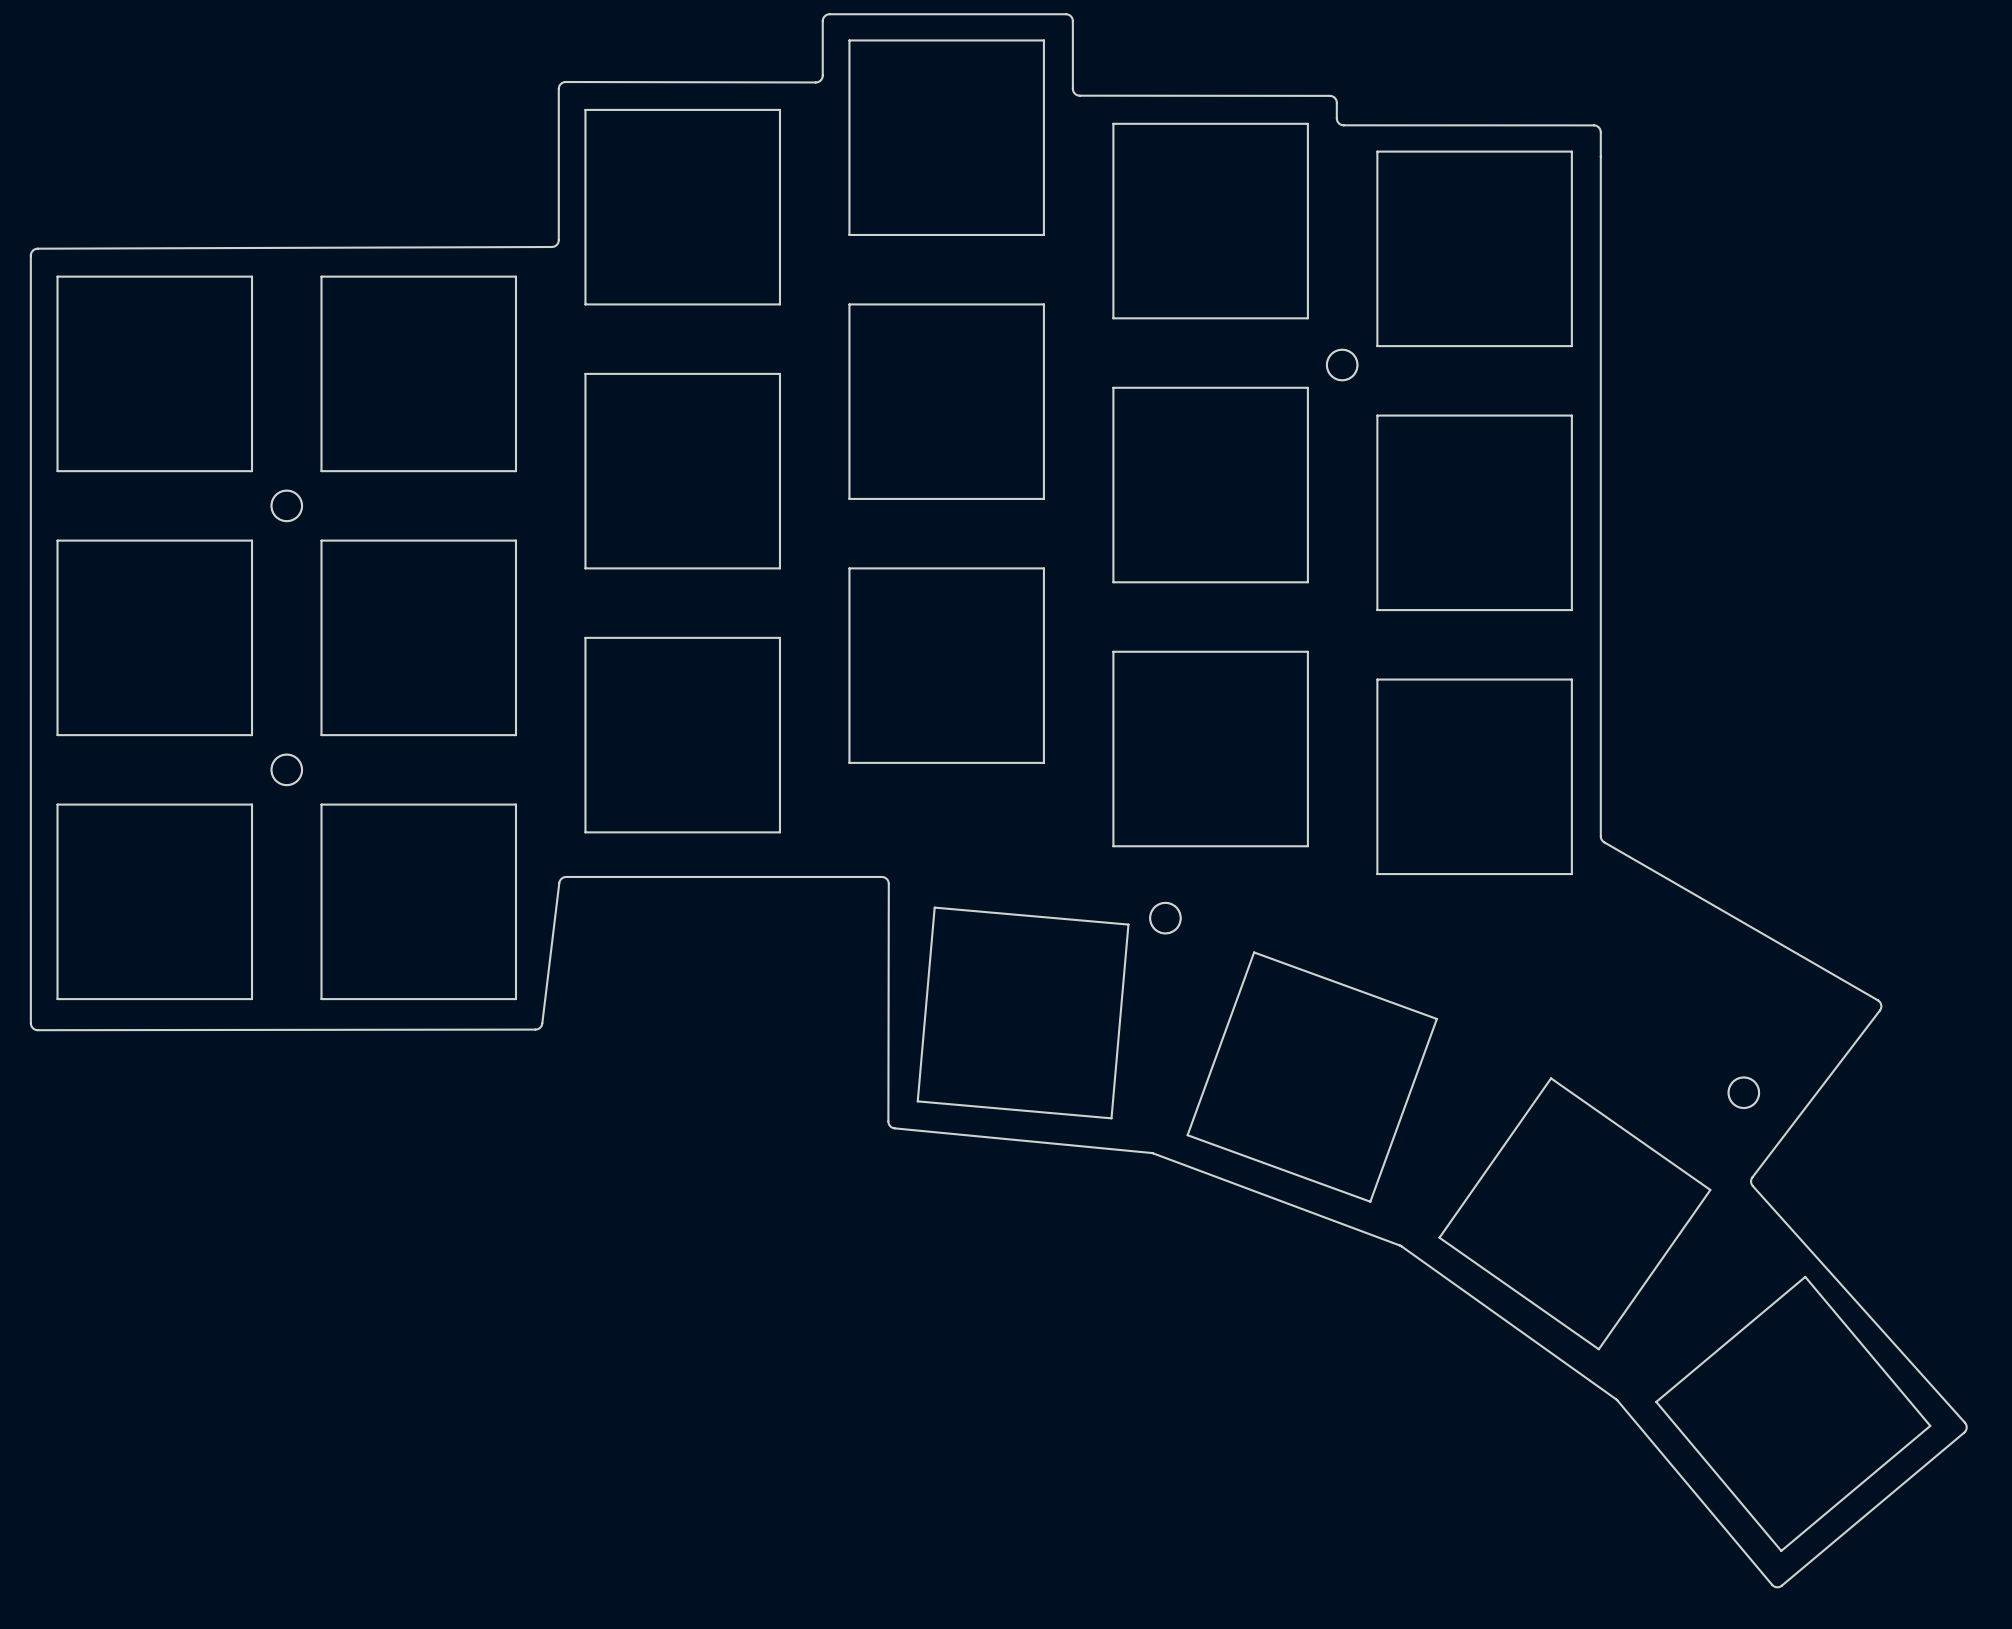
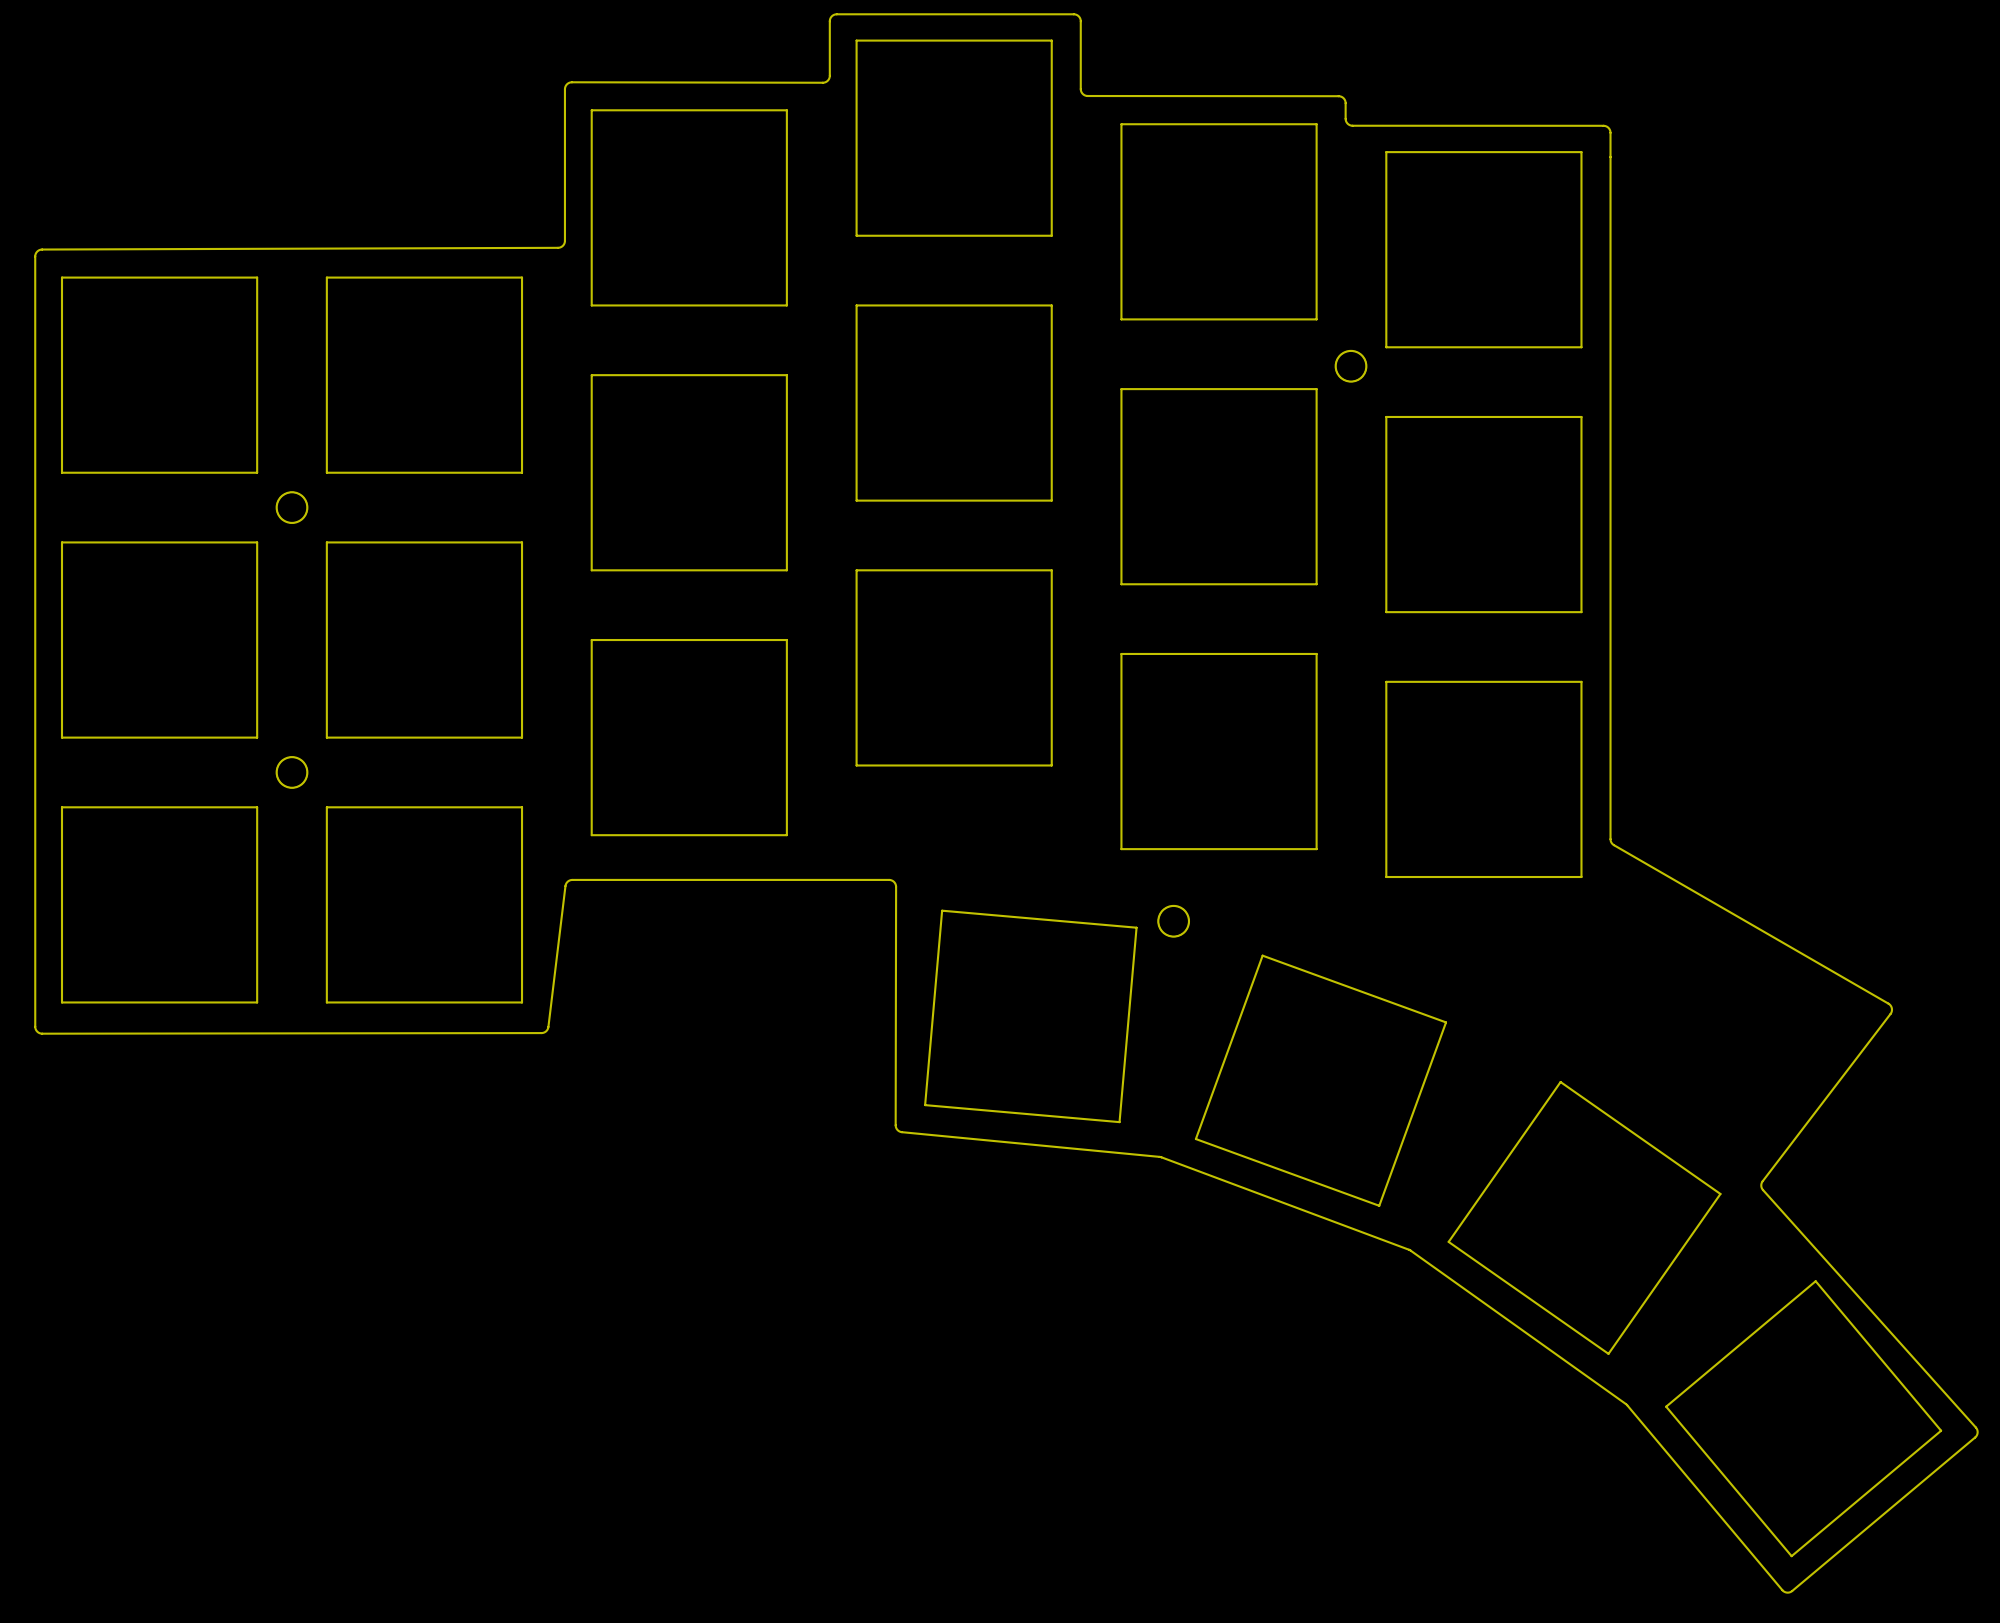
round board edge: [1727, 1076, 1761, 1110] -> none

